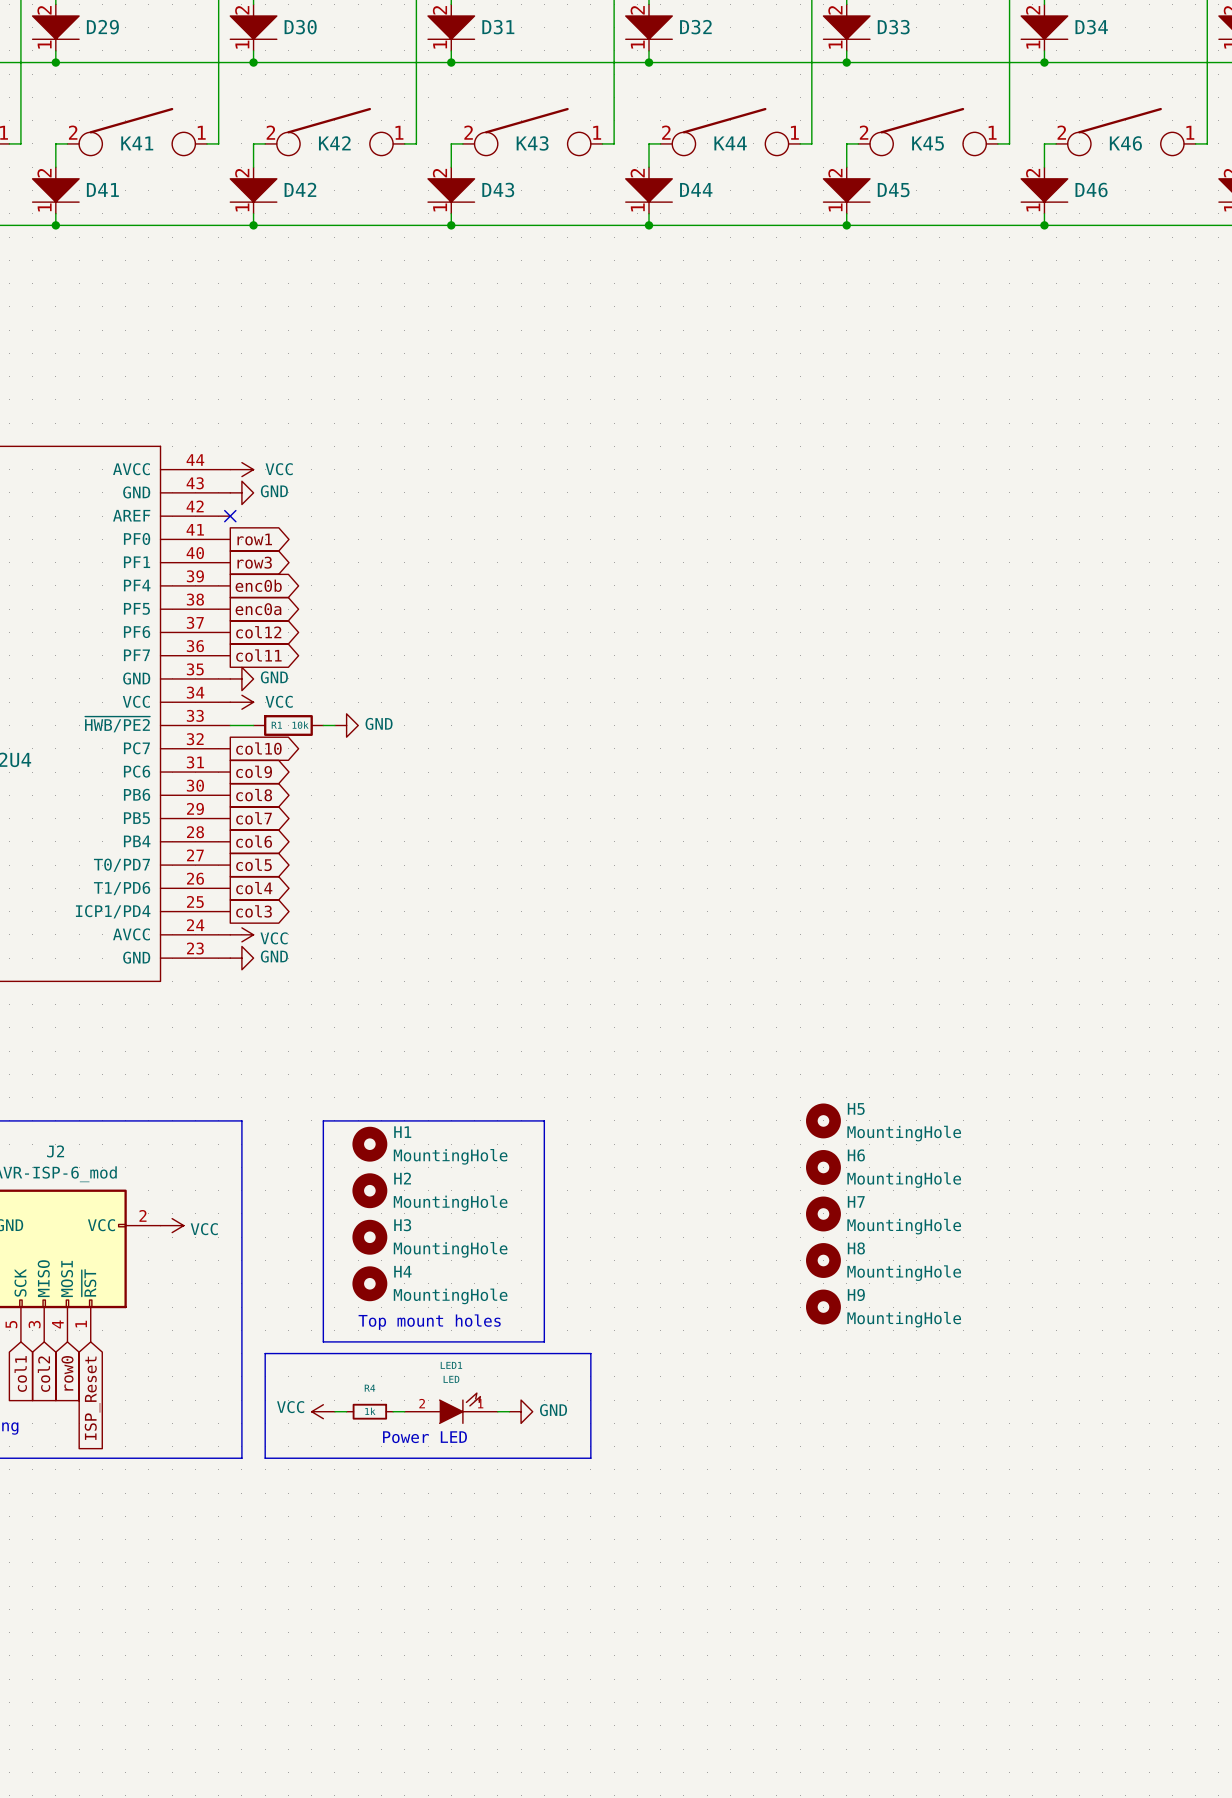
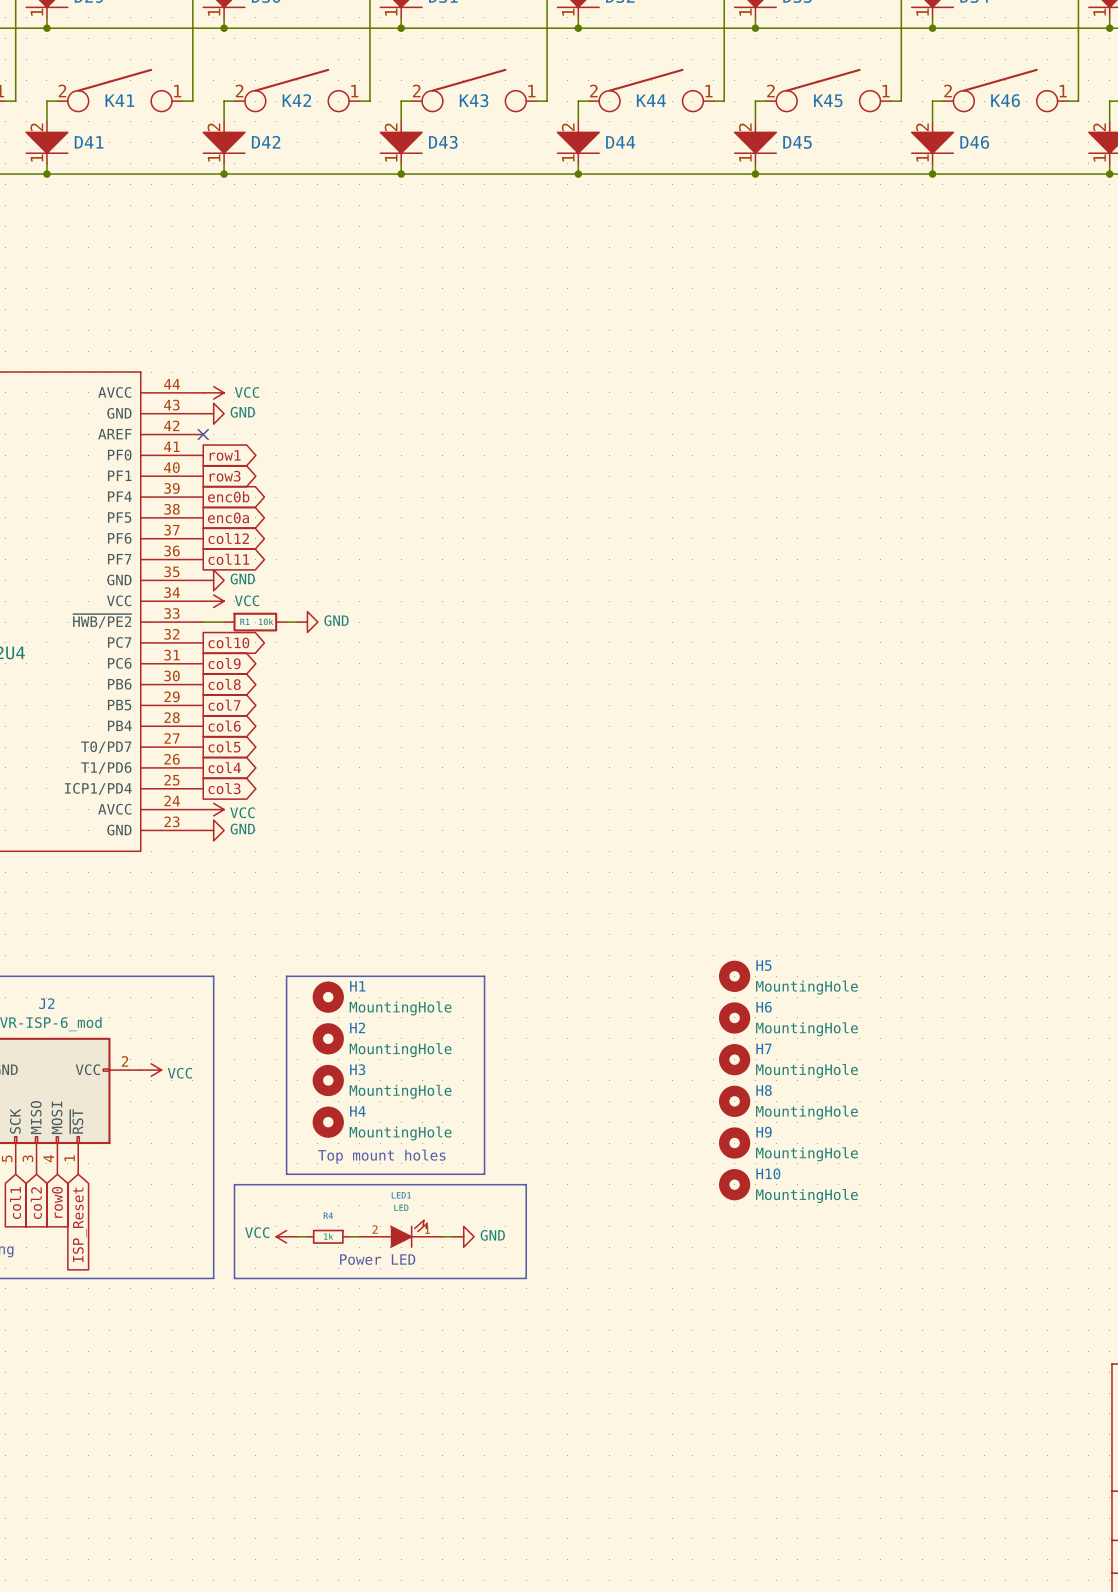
H10: none -> MountingHole (734, 1184)

